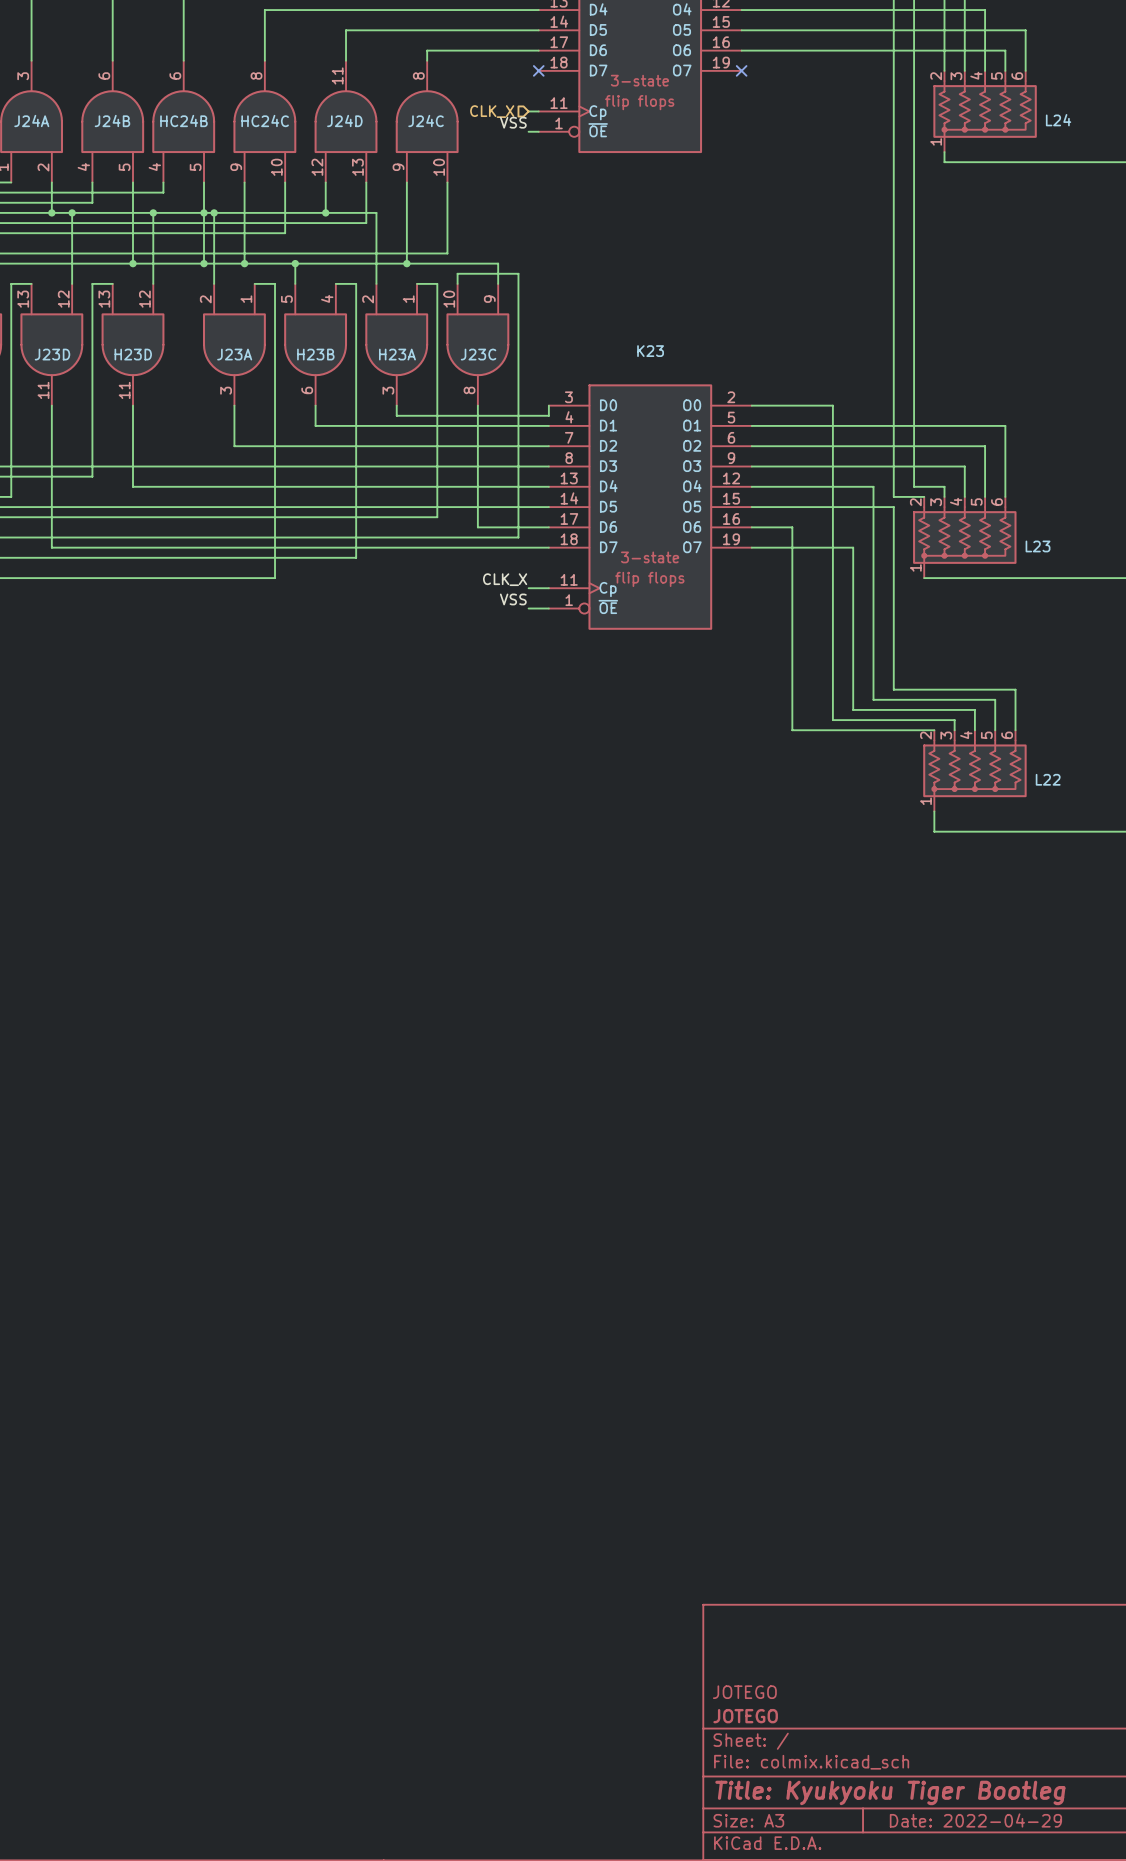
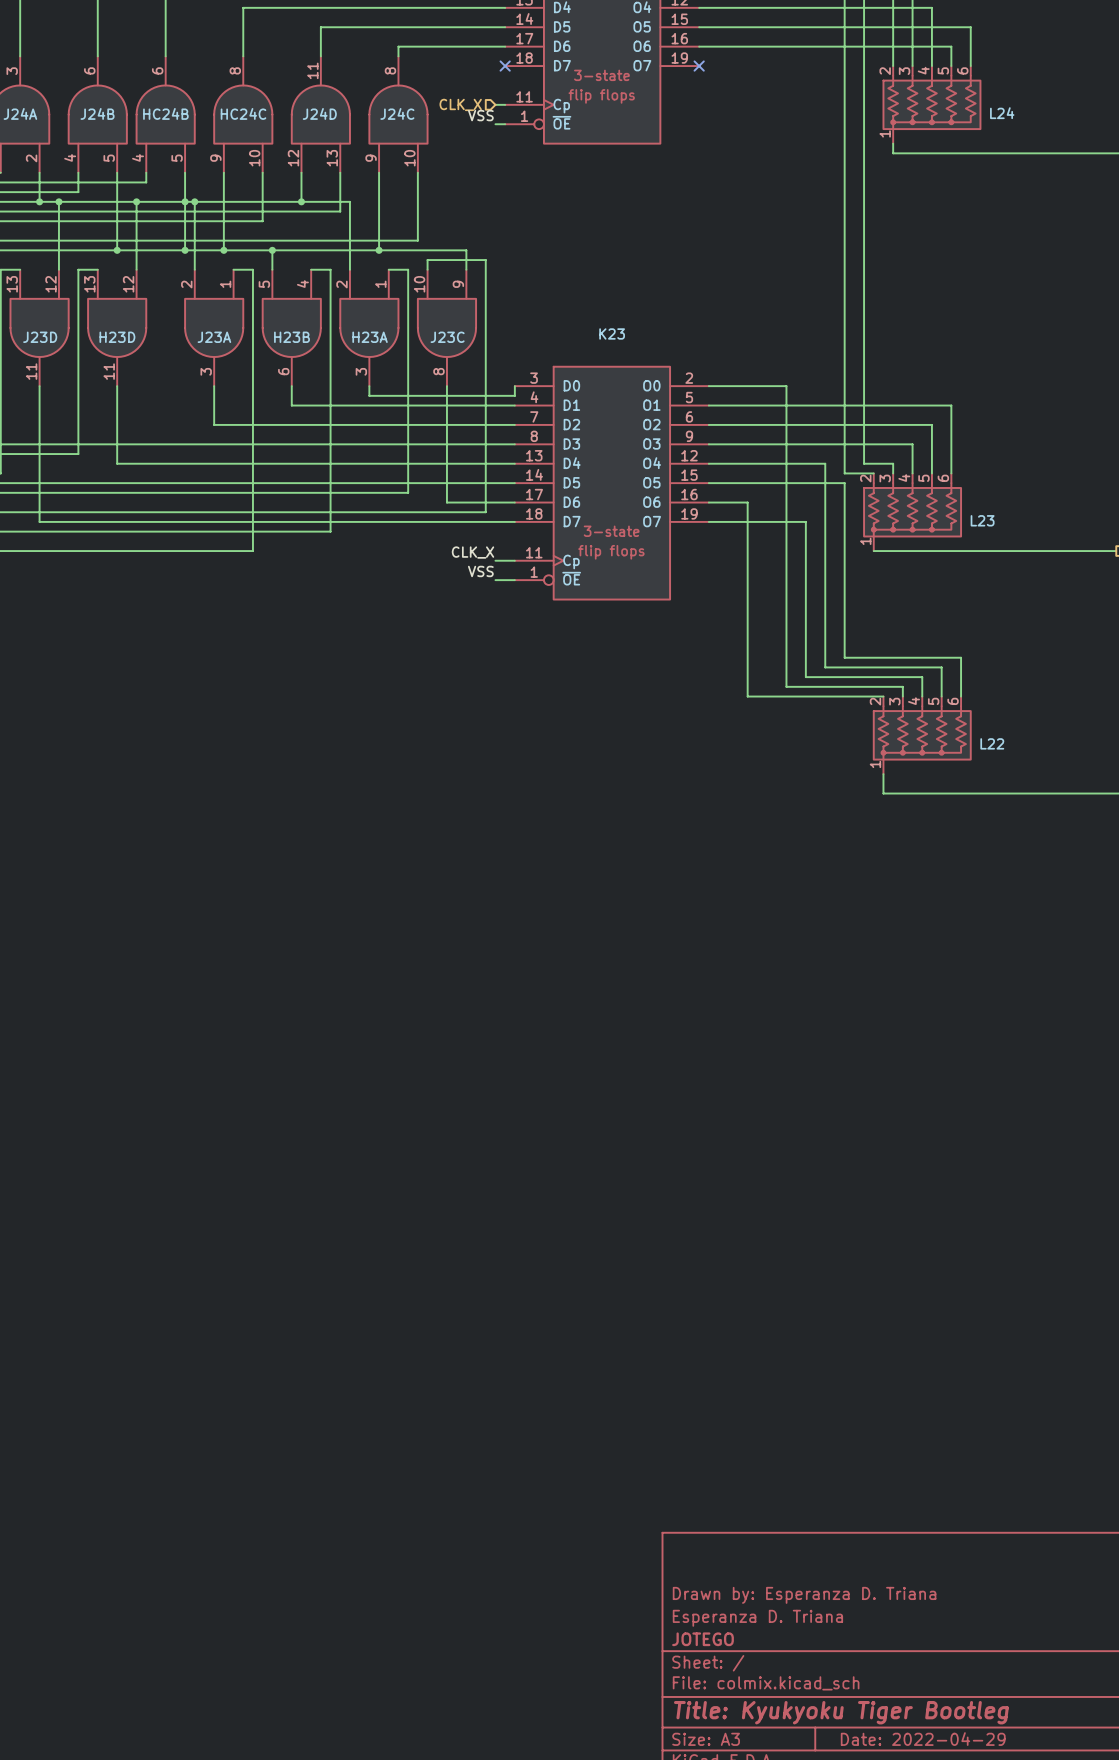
title block: none -> Drawn by: Esperanza D. Triana (804, 1595)
title block: JOTEGO (744, 1692) -> Esperanza D. Triana (757, 1618)

